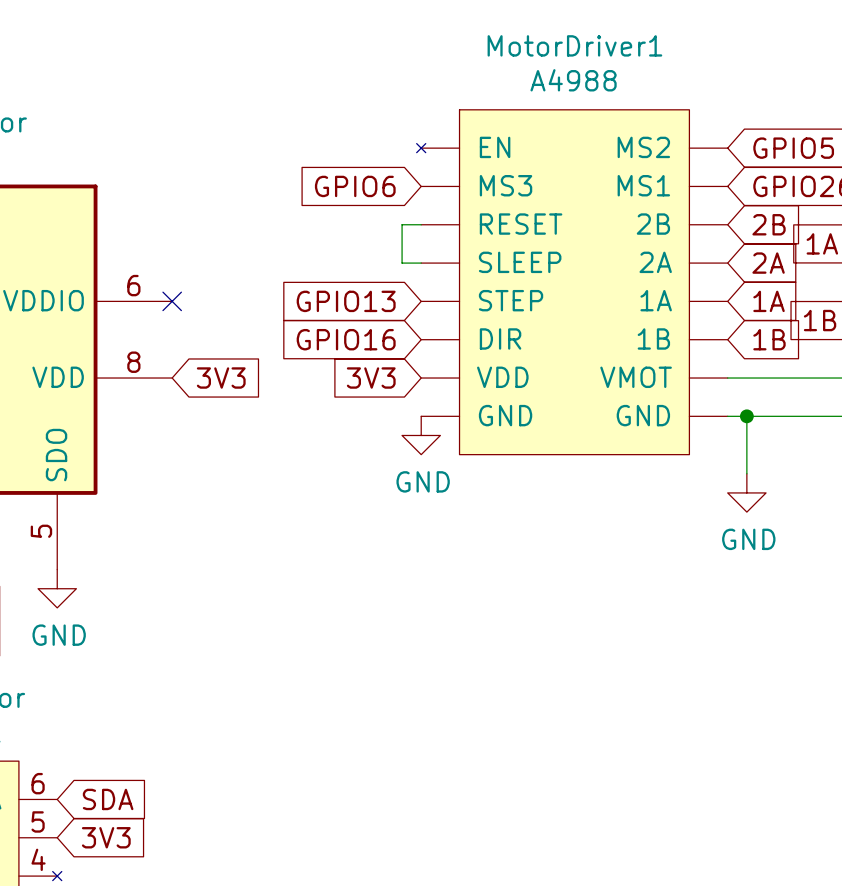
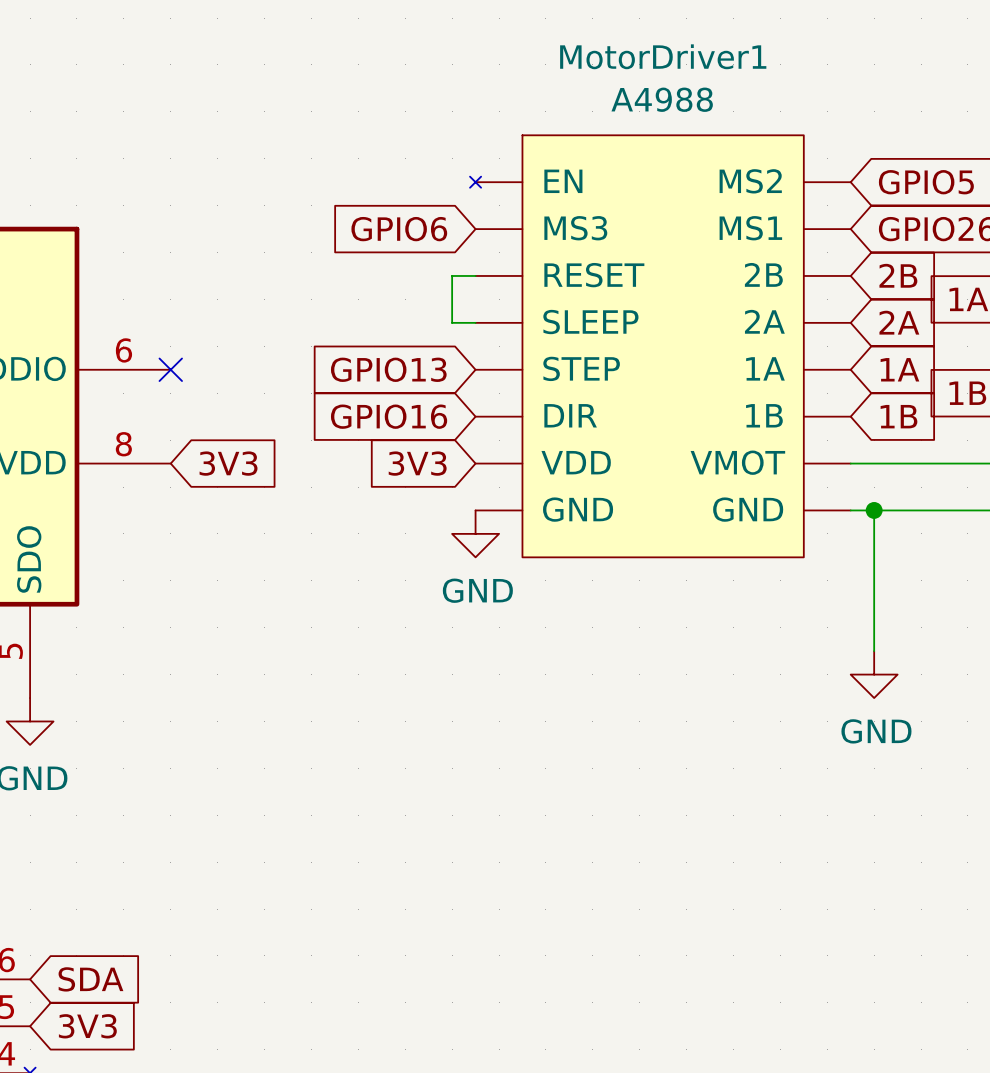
wire: none -> (874, 580) (874, 651)
power symbol position: GND (746, 492) -> GND (874, 674)

